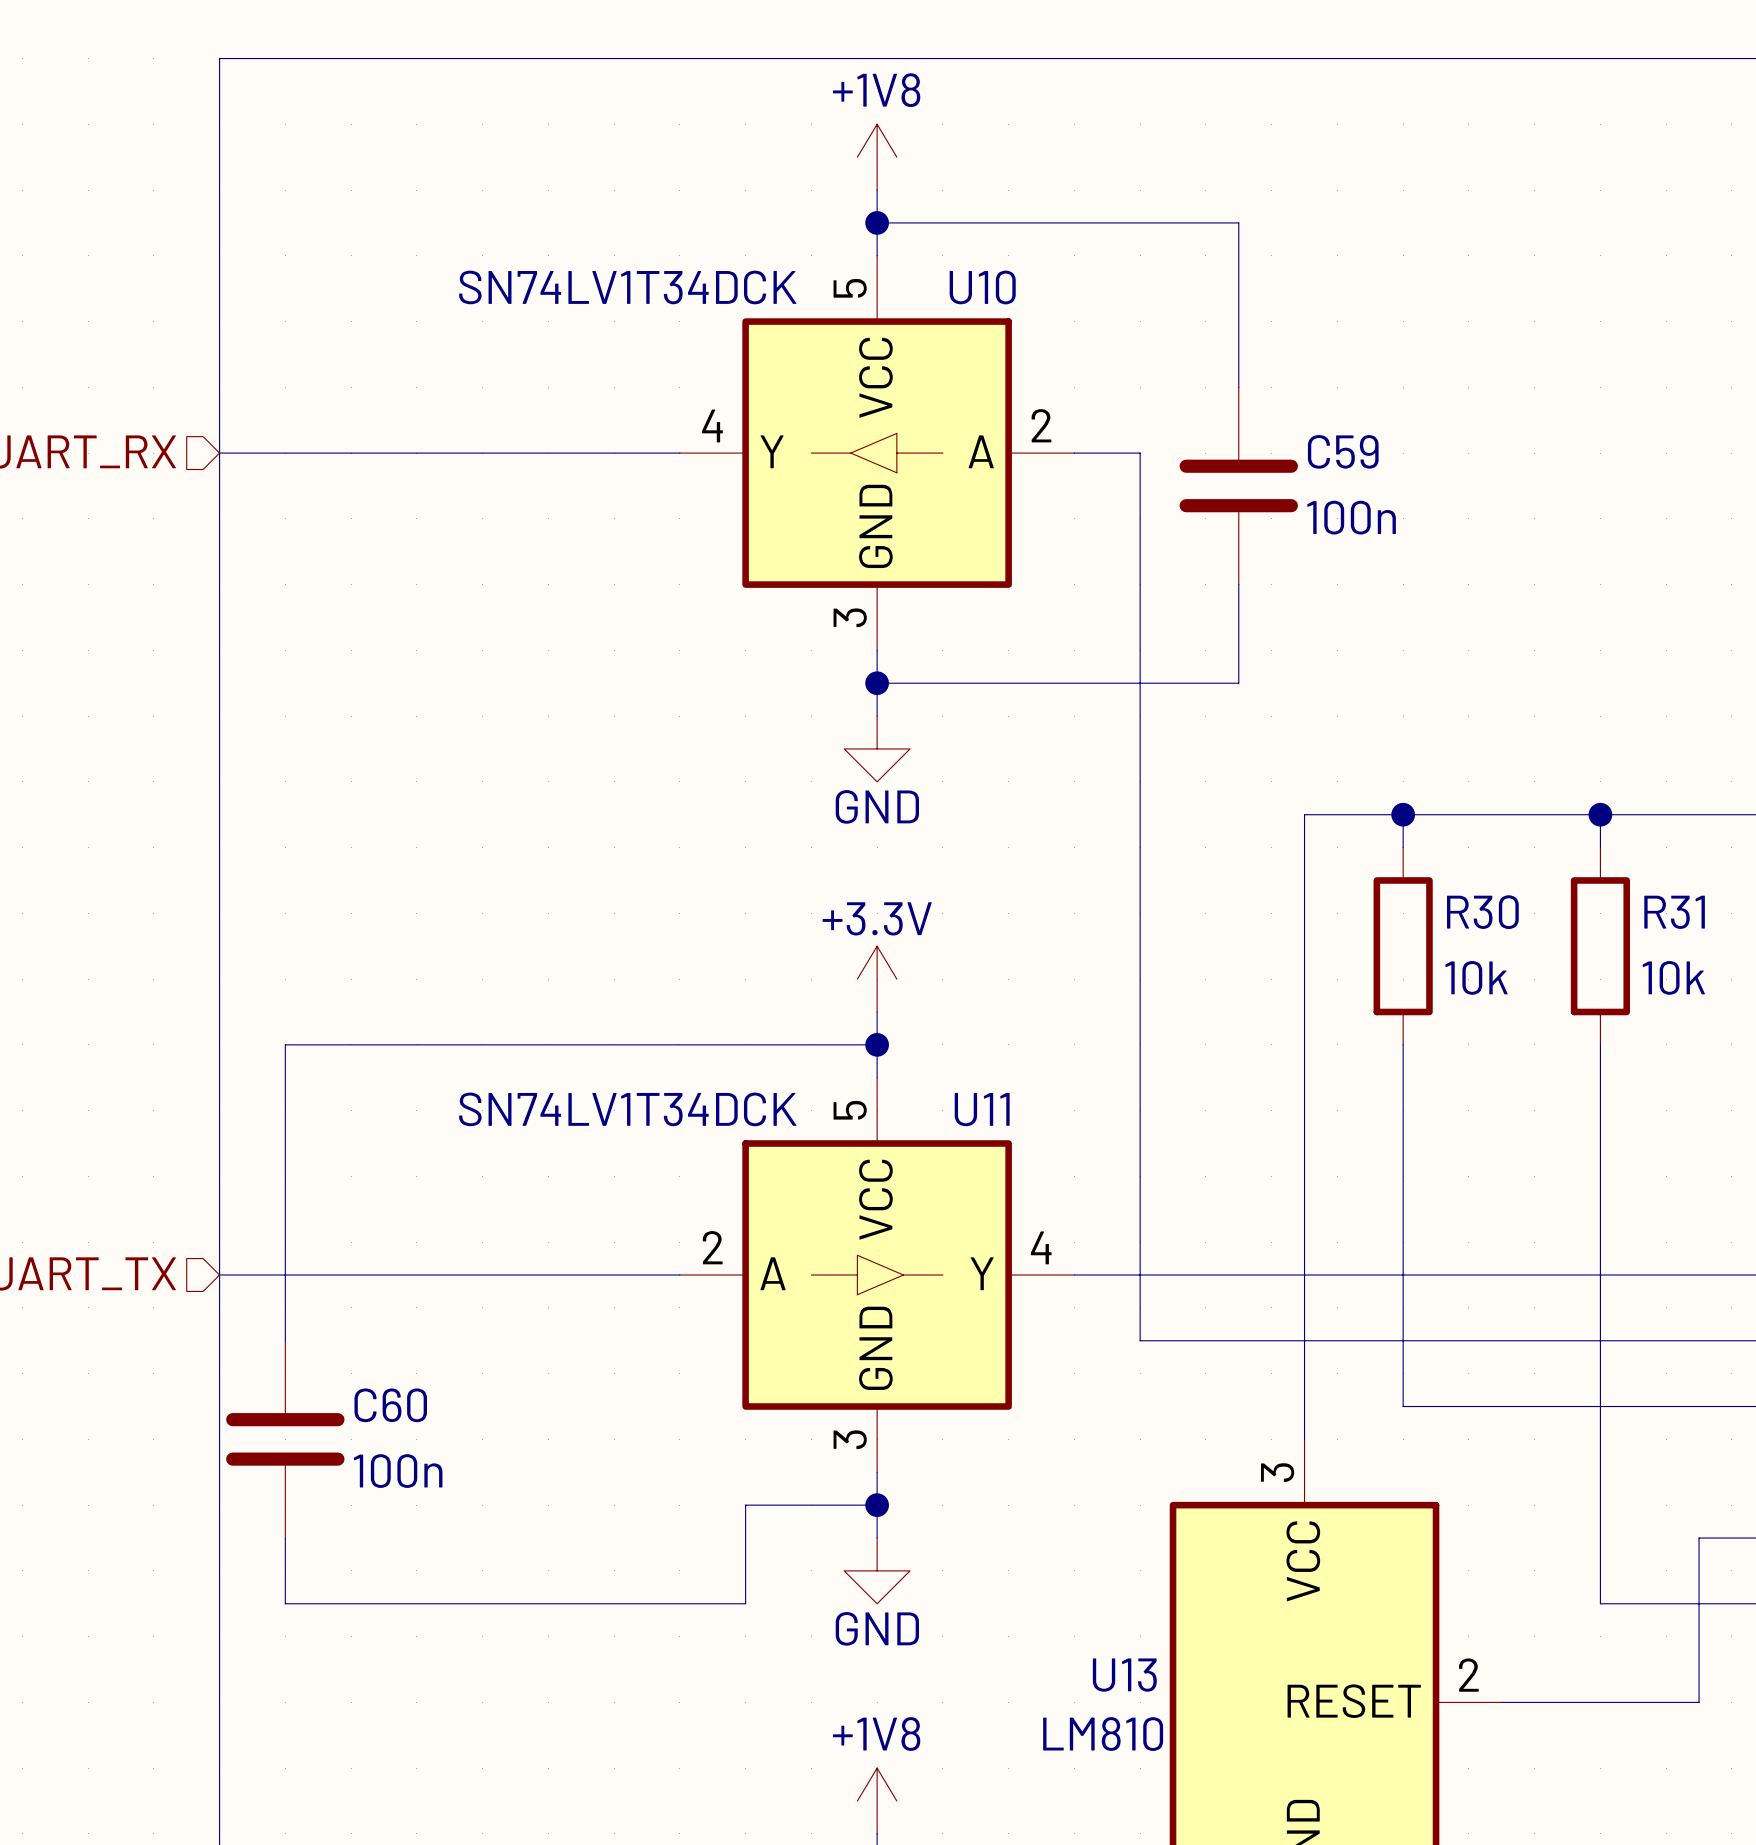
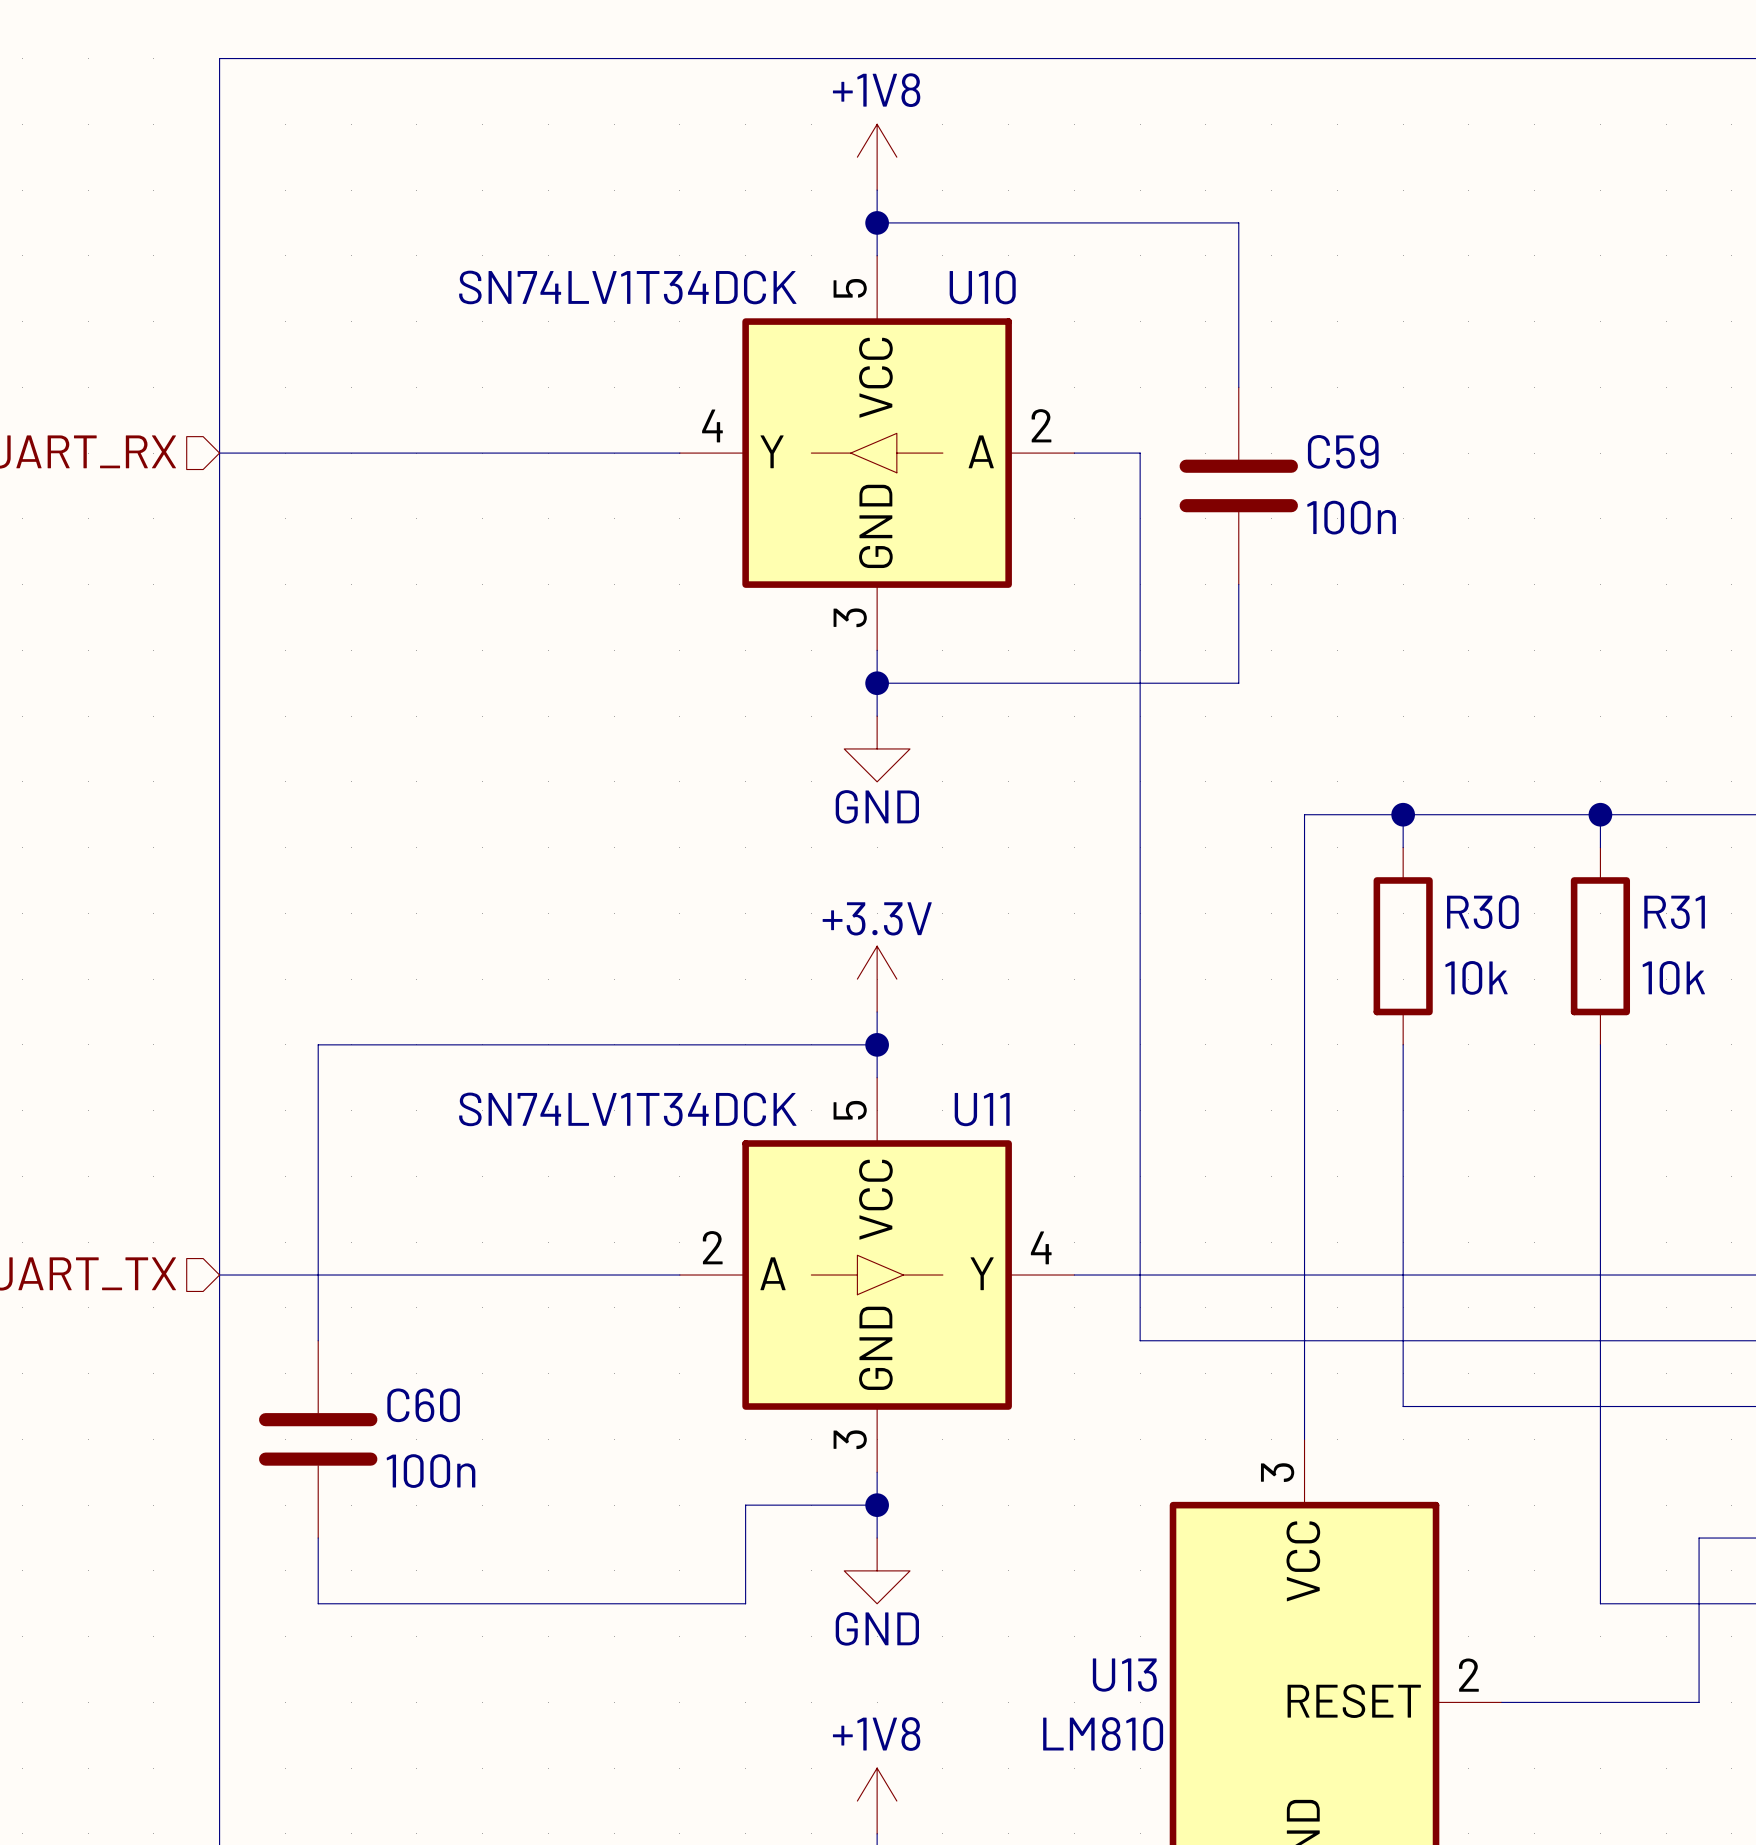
wire: (318, 1044) (285, 1044) (285, 1340) -> (318, 1044) (318, 1340)
C60 position: (285, 1439) -> (318, 1439)
wire: (285, 1538) (285, 1603) (318, 1603) -> (318, 1538) (318, 1603)

